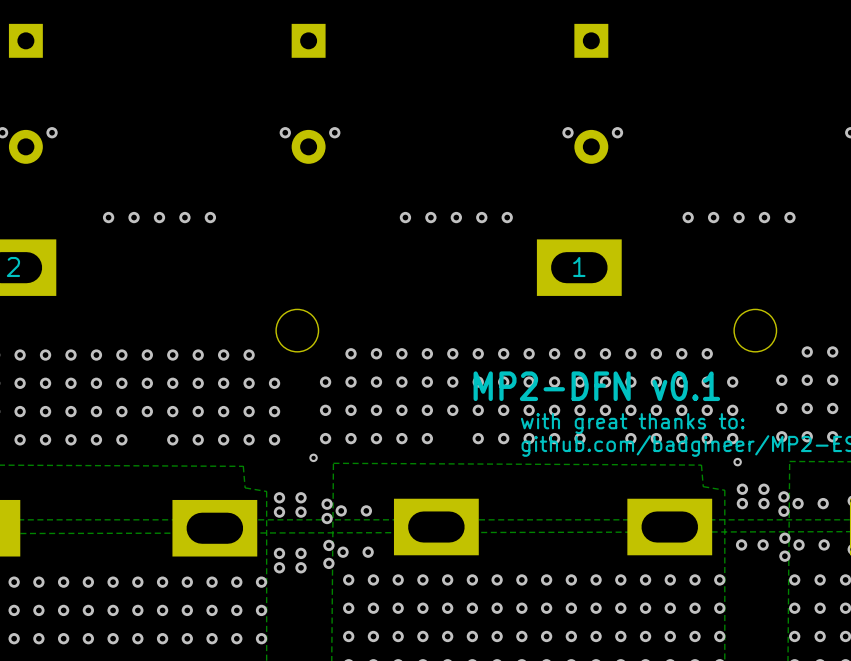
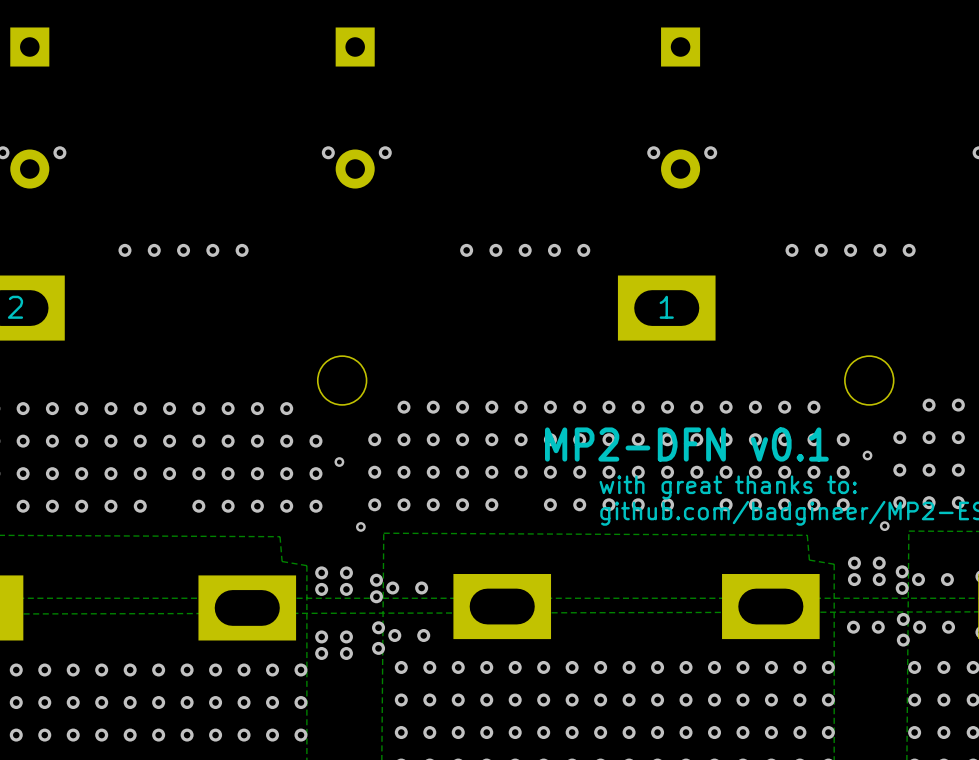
via: none -> (867, 455)
via: none -> (339, 462)
via position: (737, 462) -> (884, 526)

